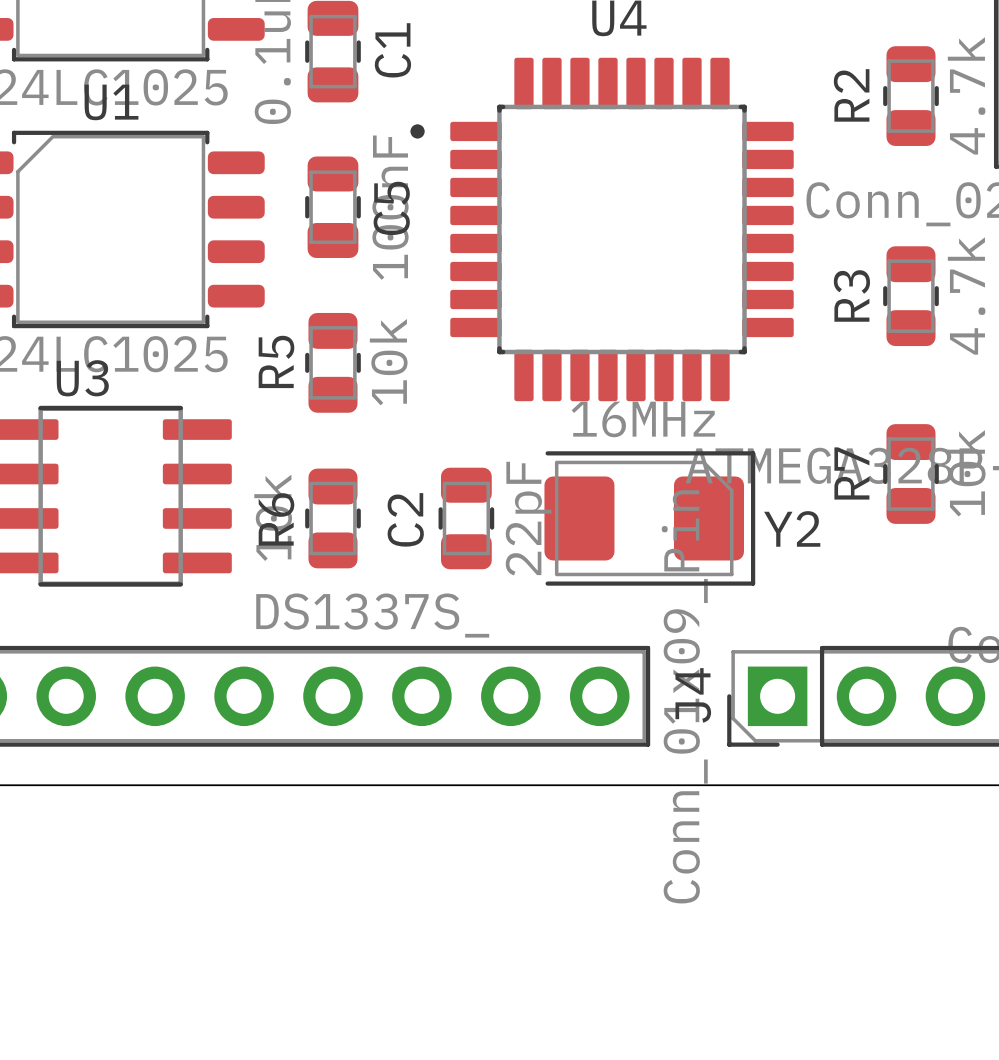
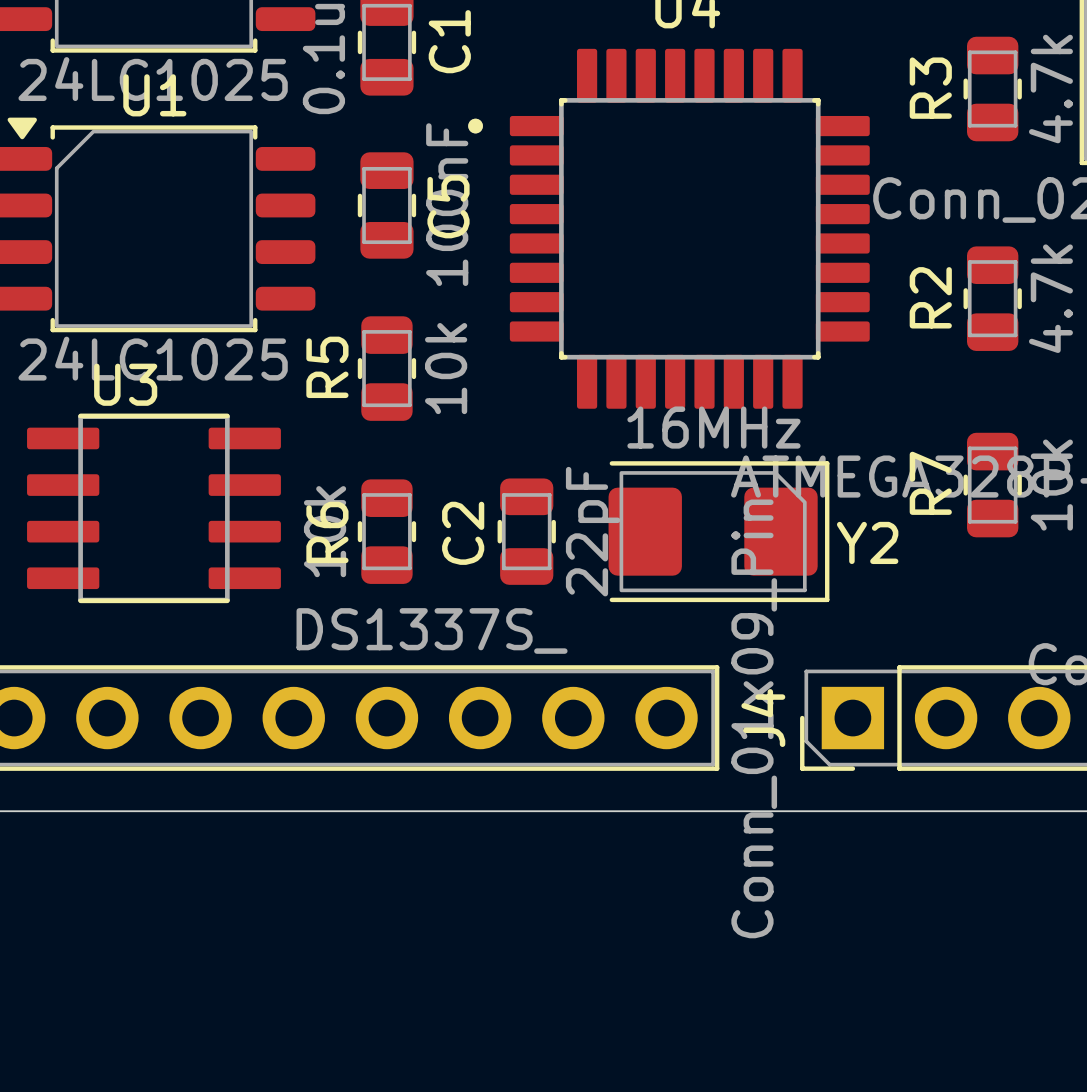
R2 name: R2 (851, 95) -> R3 (930, 88)
R3 name: R3 (851, 295) -> R2 (930, 297)

